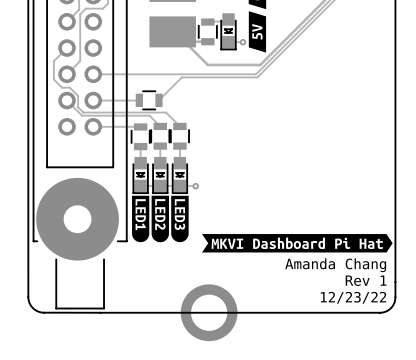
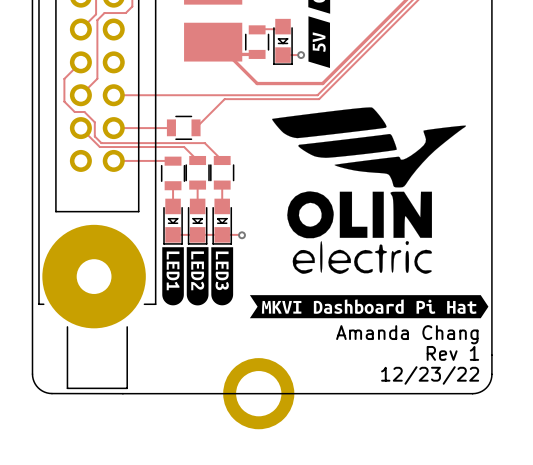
drawing: none -> [272, 107, 466, 274]

